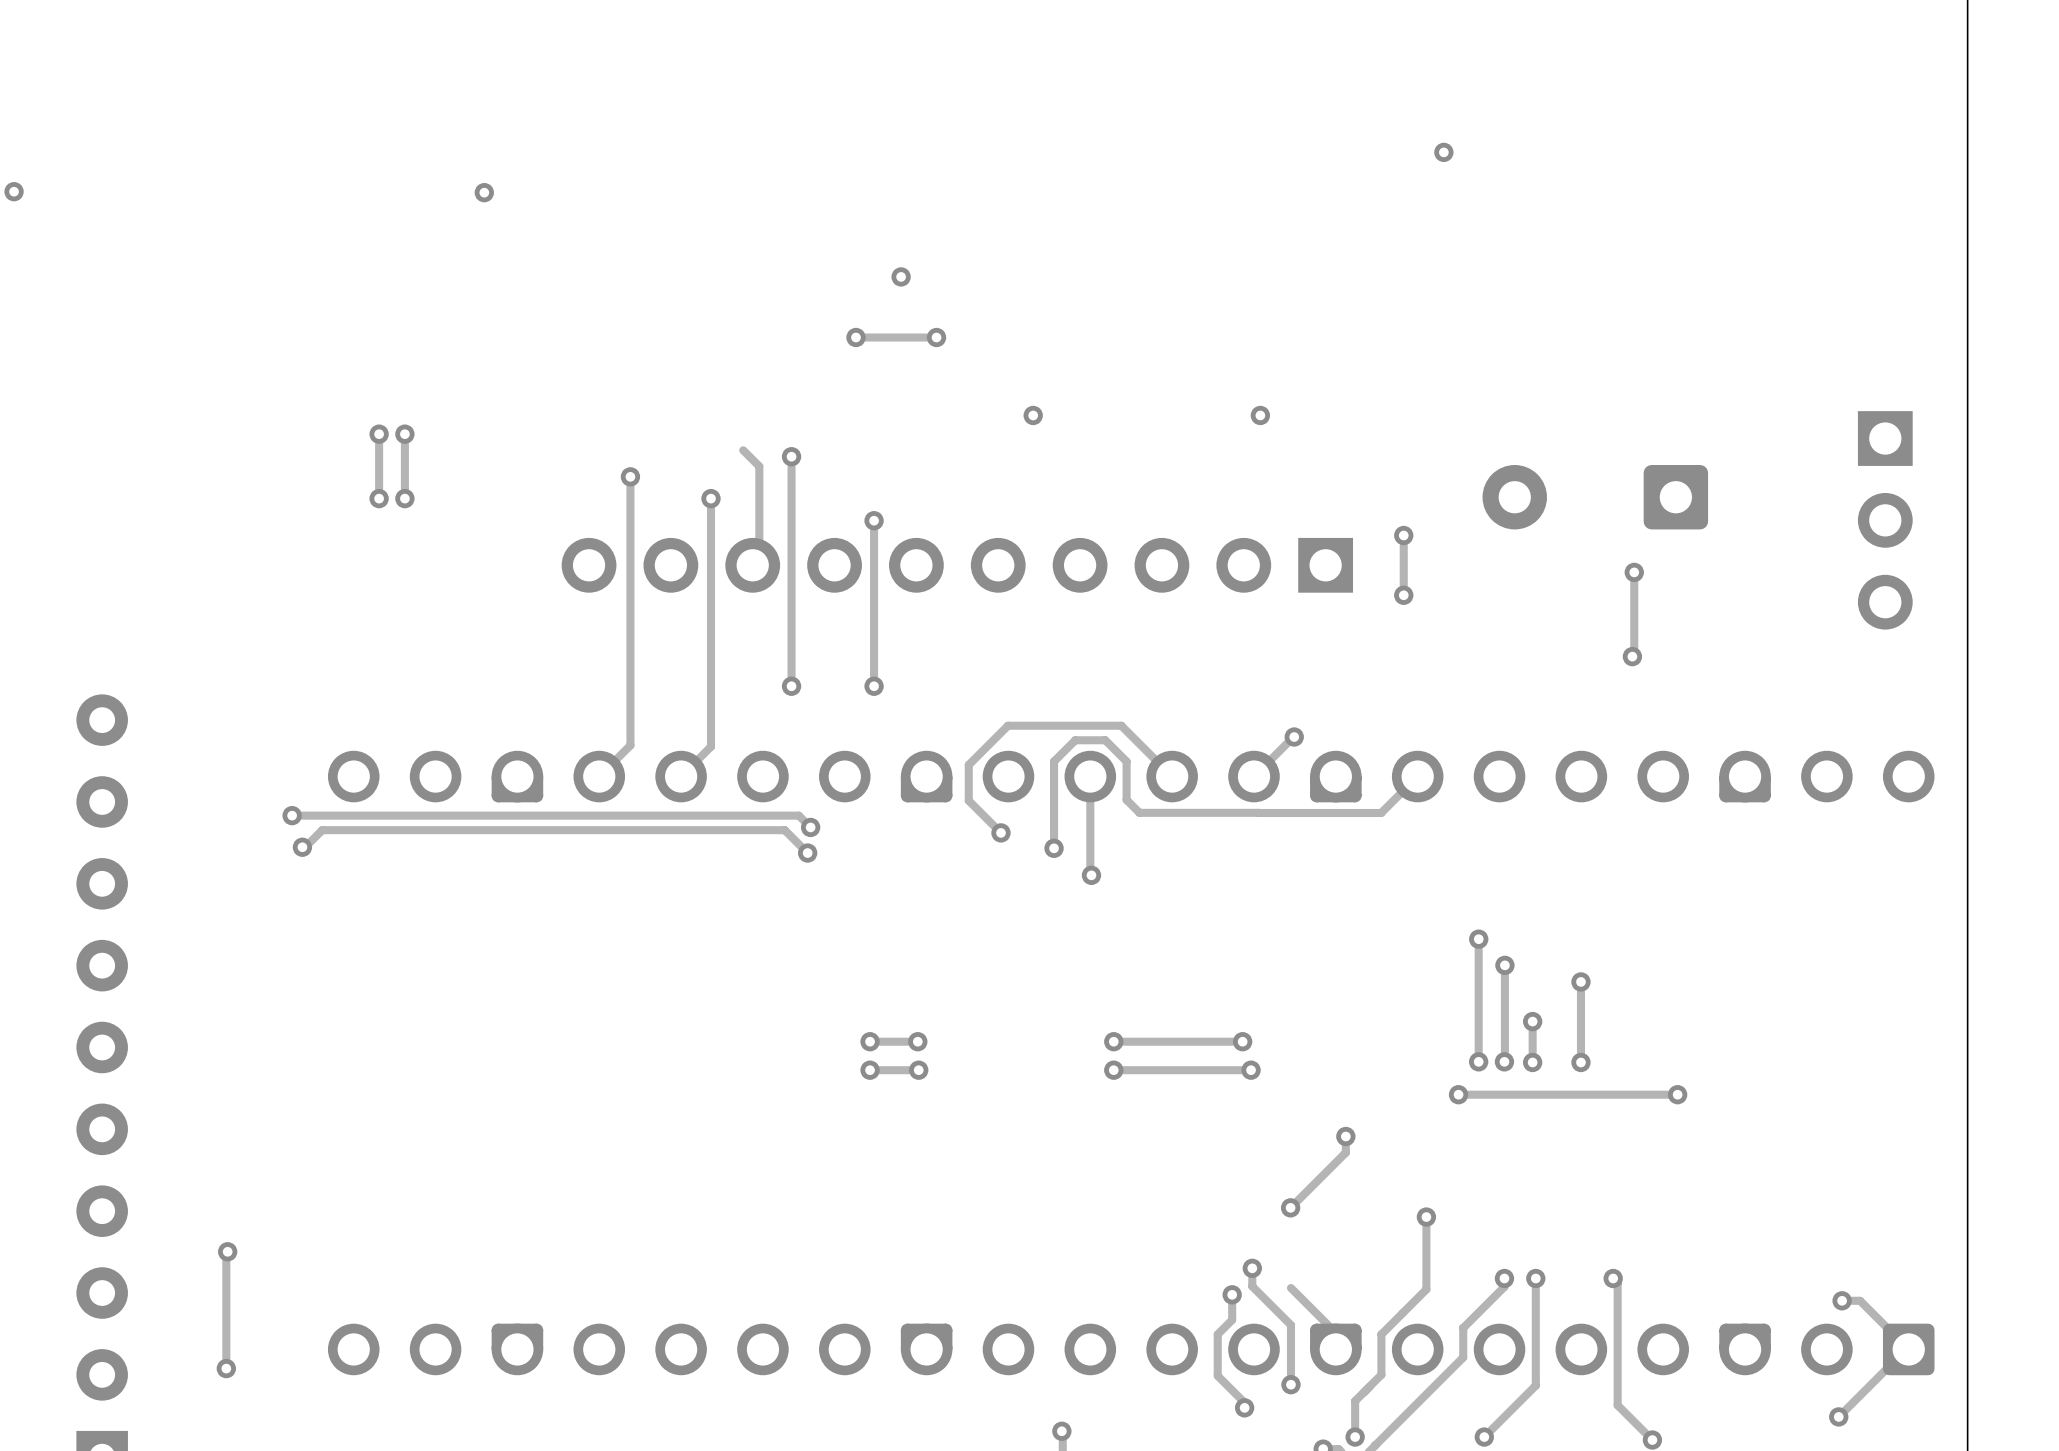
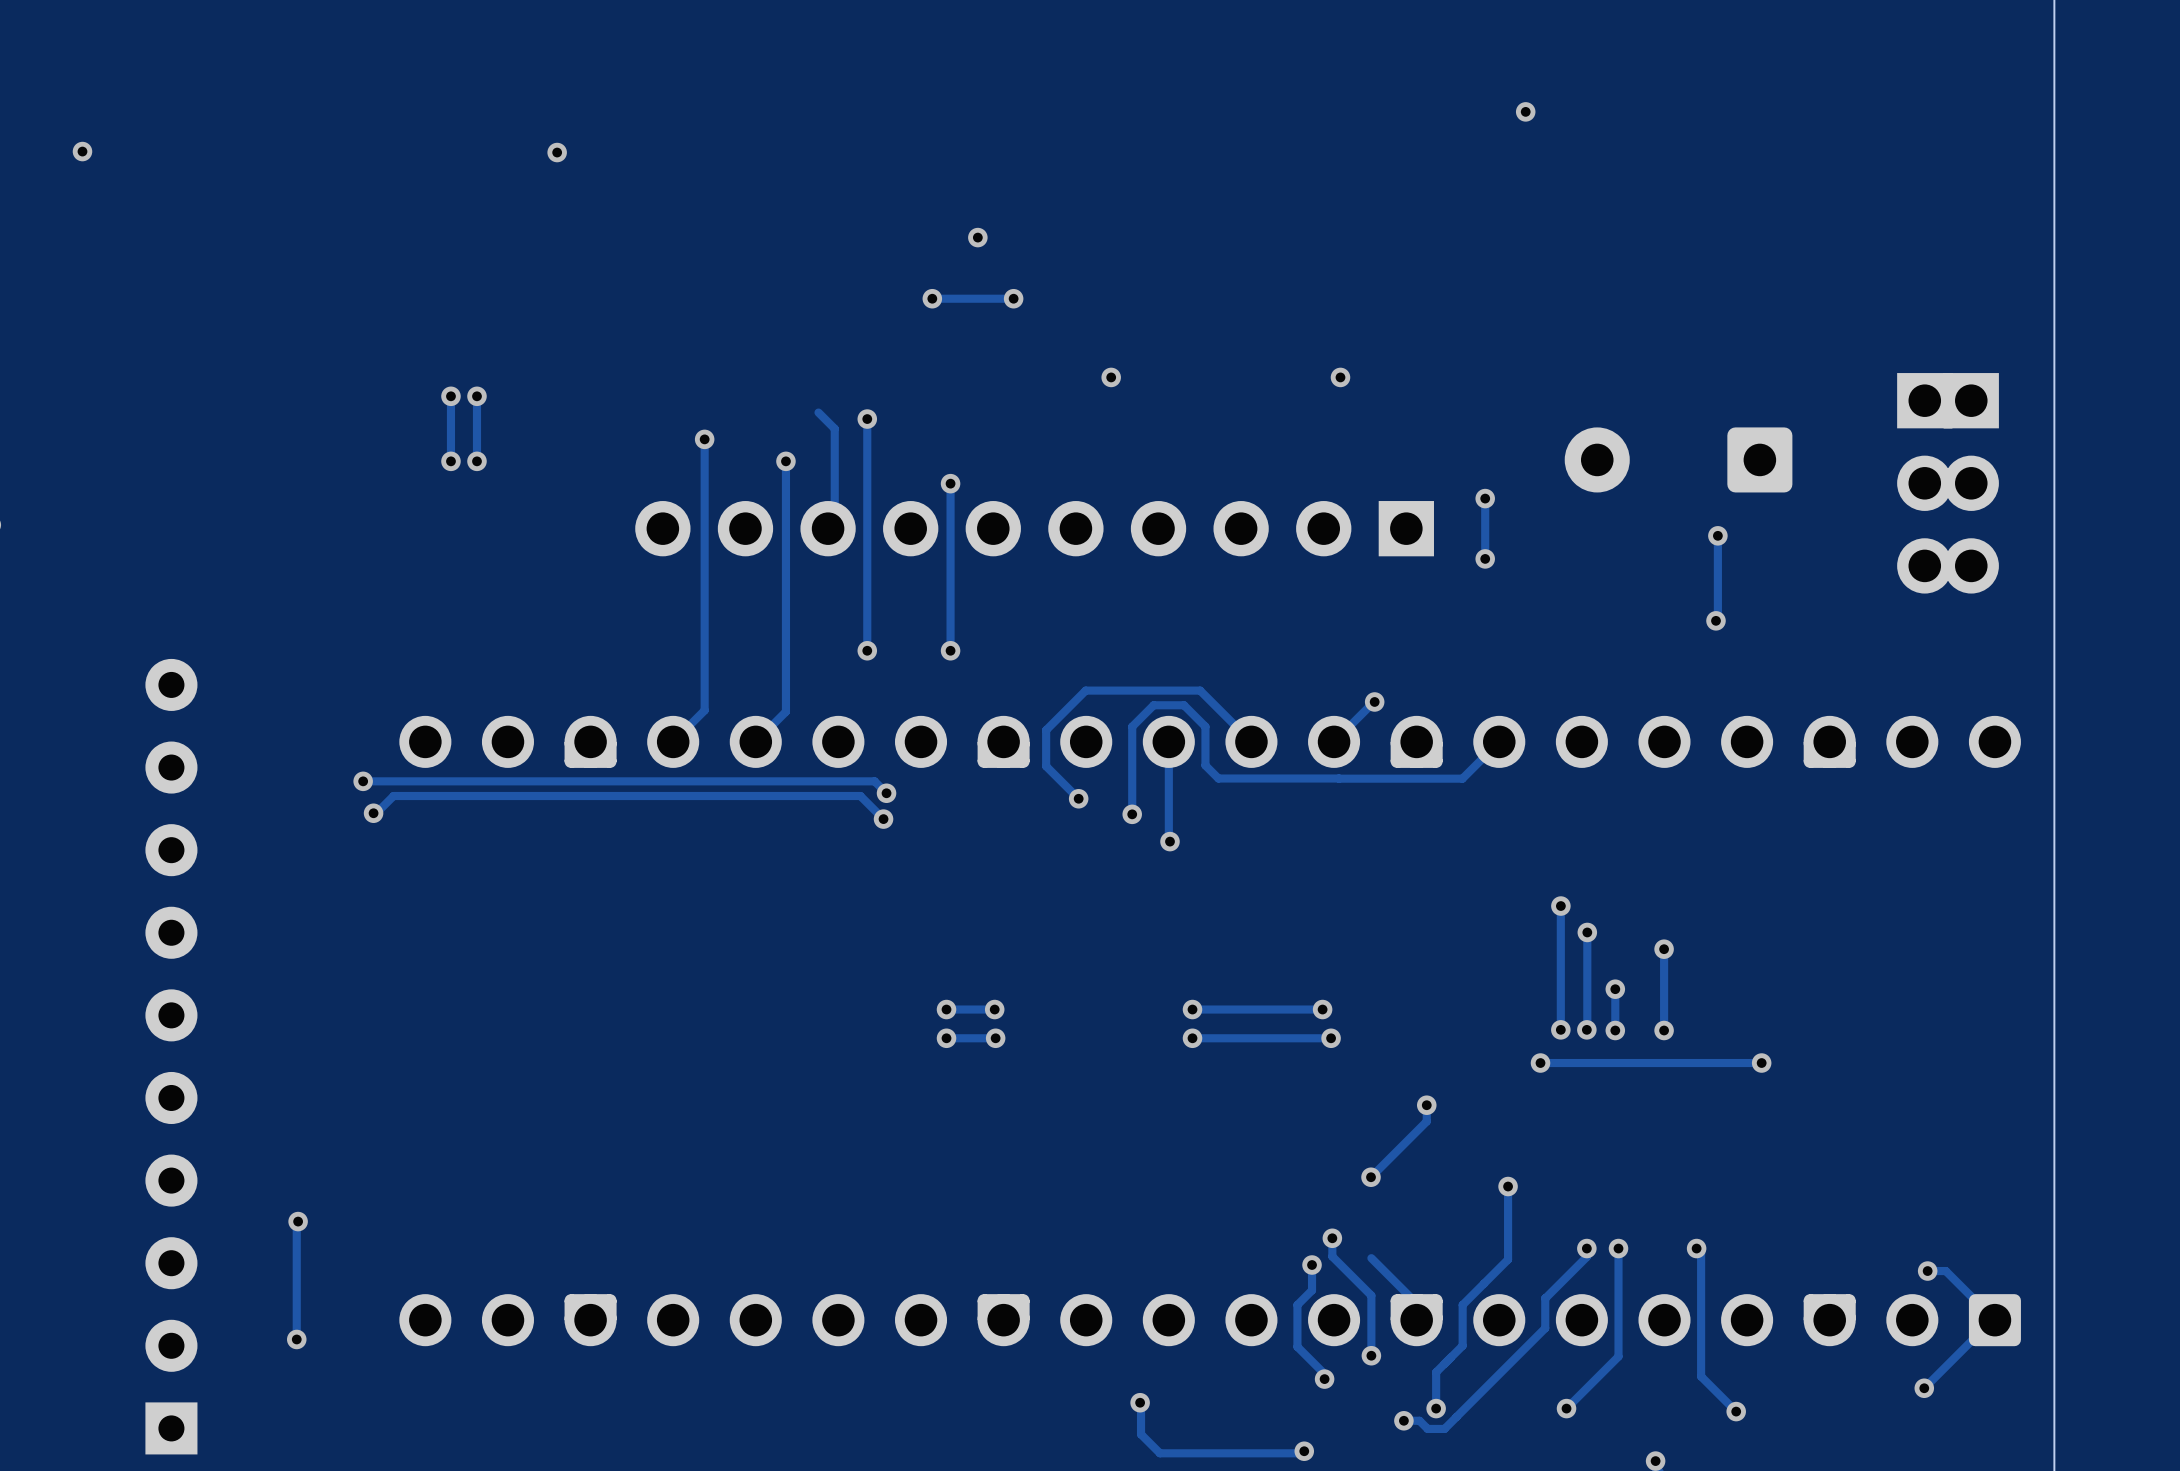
part: none -> (1924, 400)
part: none -> (1924, 483)
part: none -> (1924, 565)

